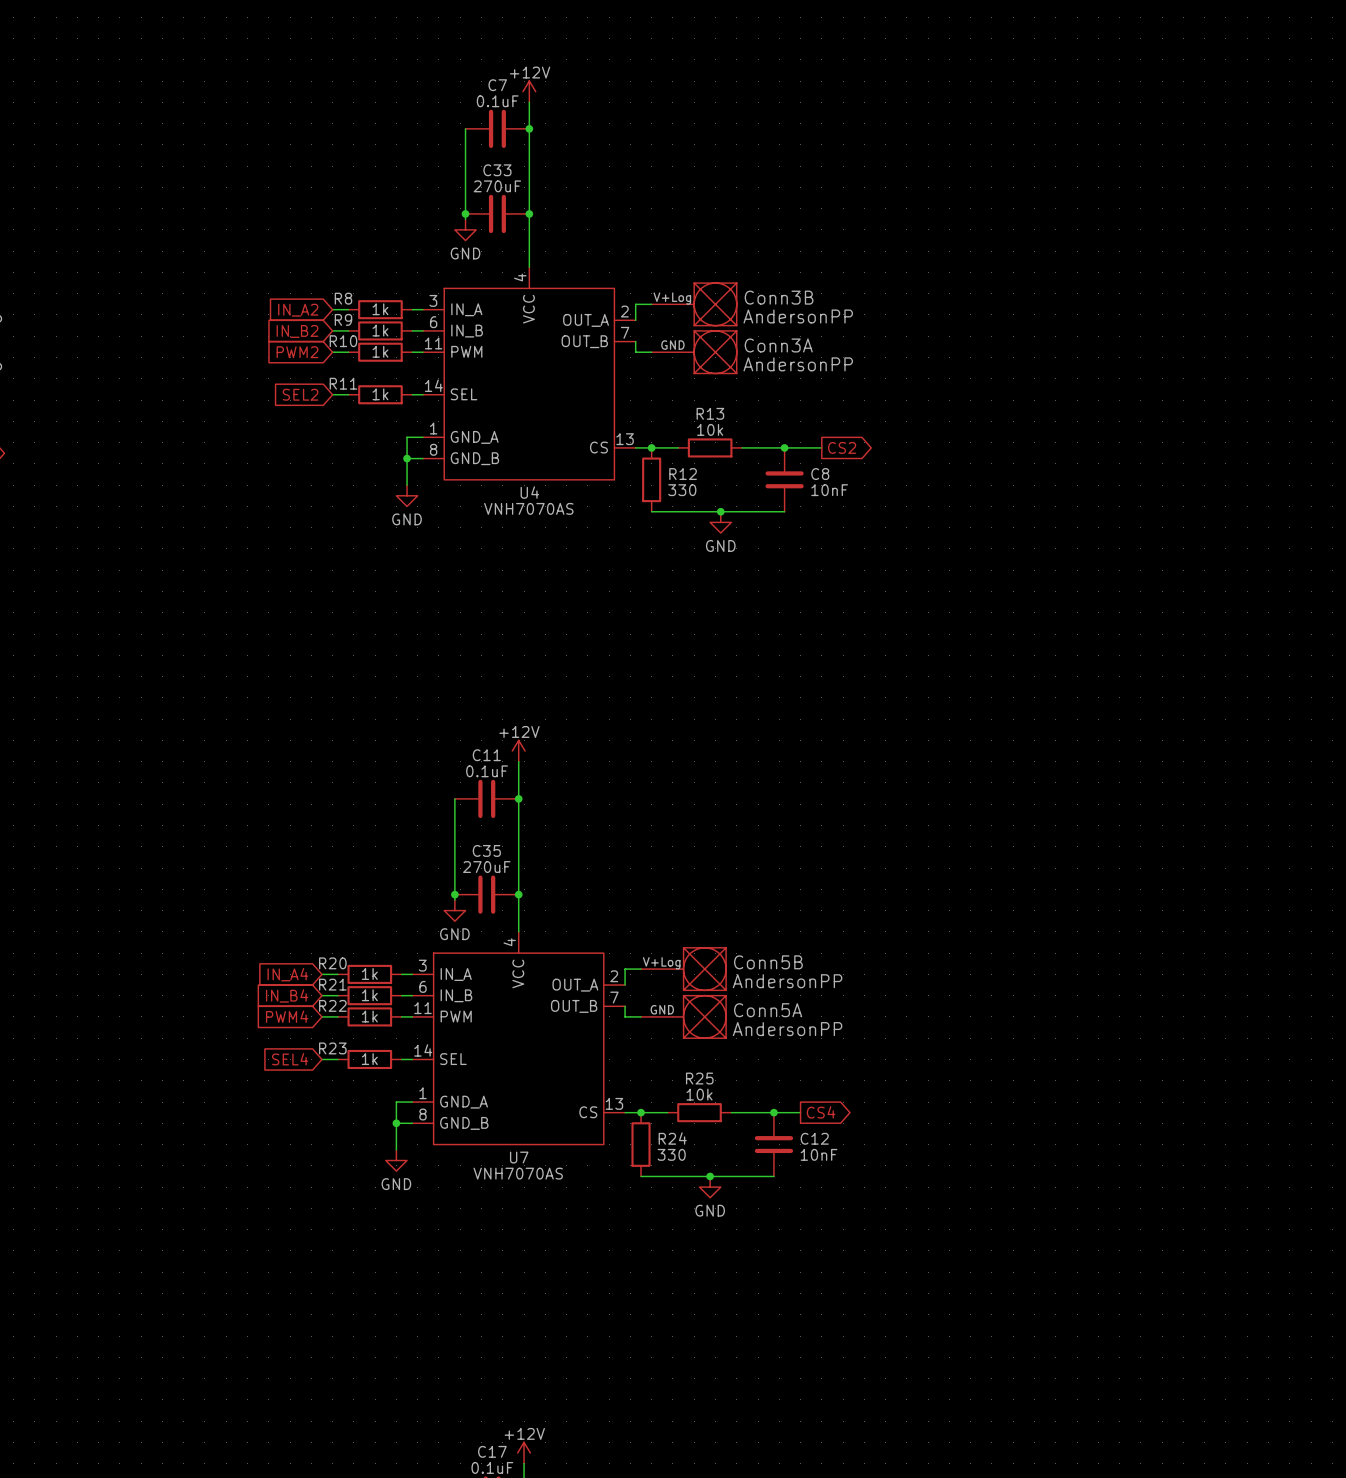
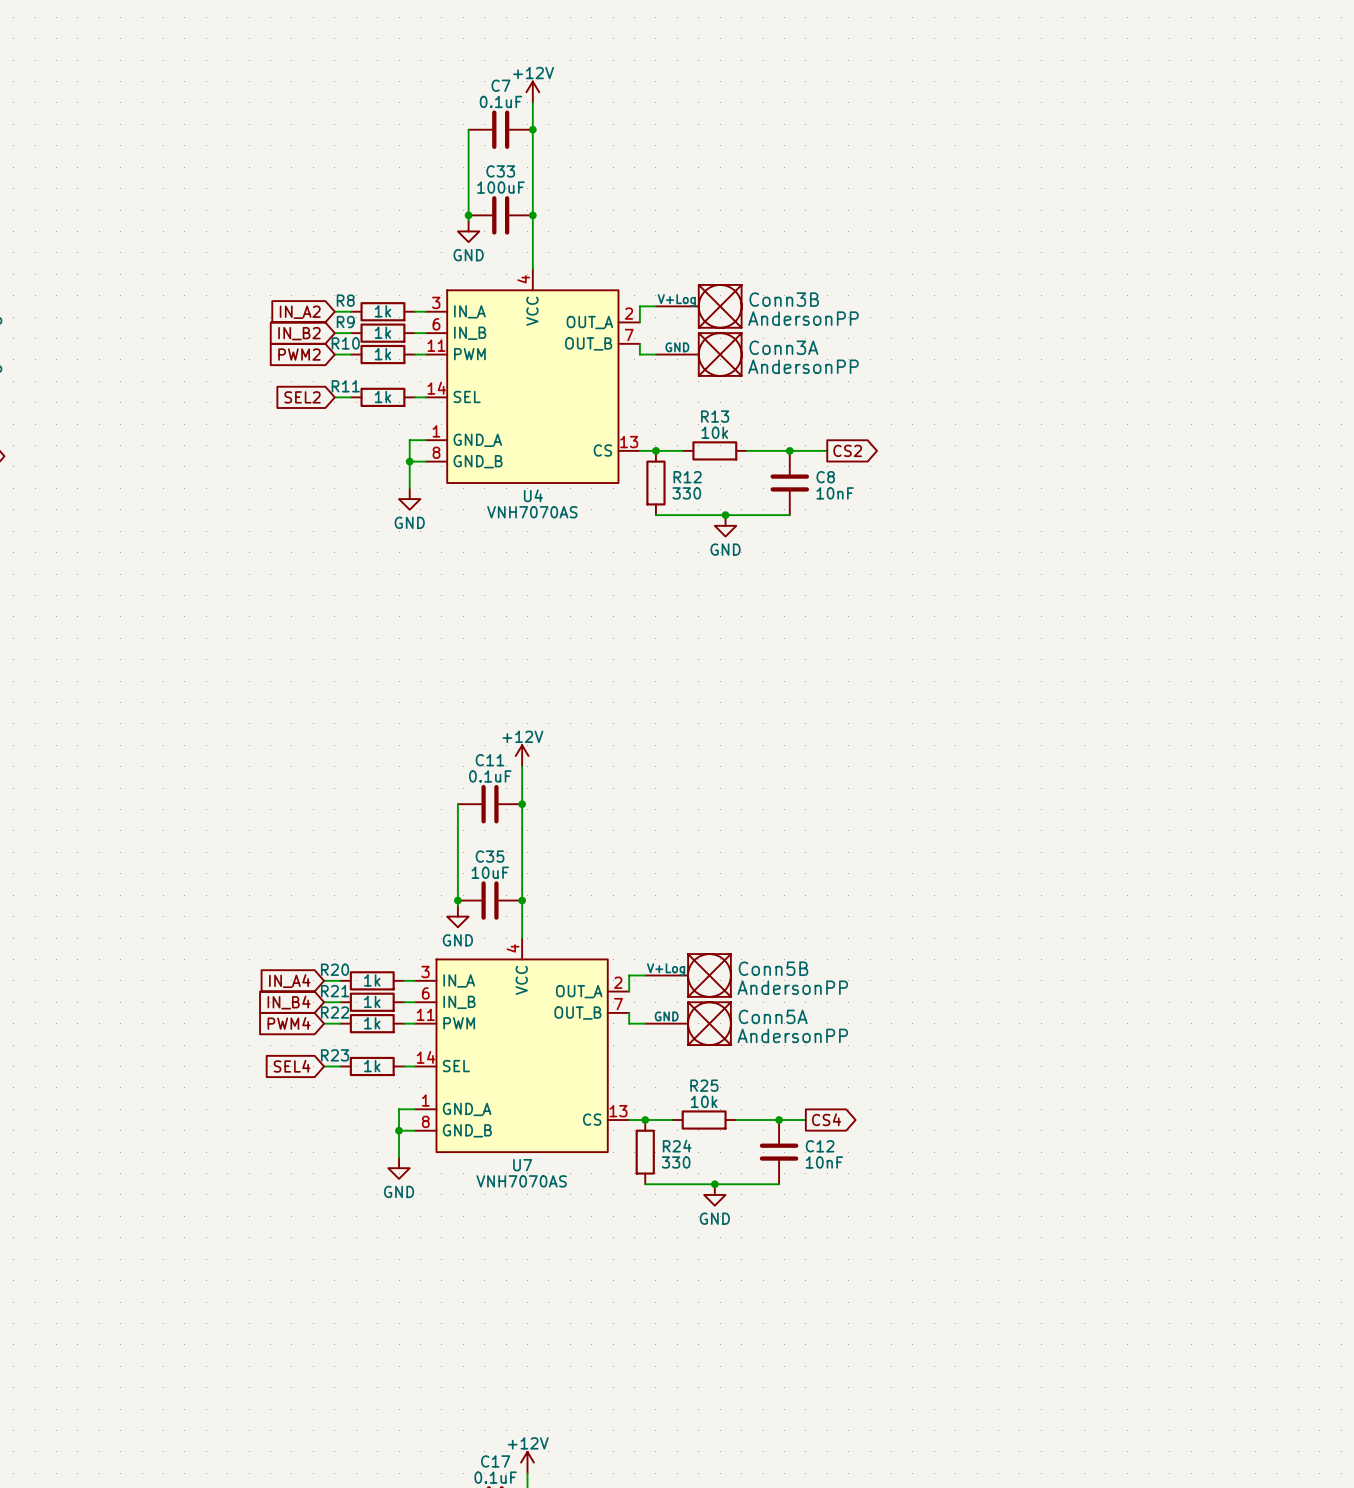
C33 value: 270uF (497, 186) -> 100uF (500, 187)
C35 value: 270uF (486, 867) -> 10uF (490, 872)

